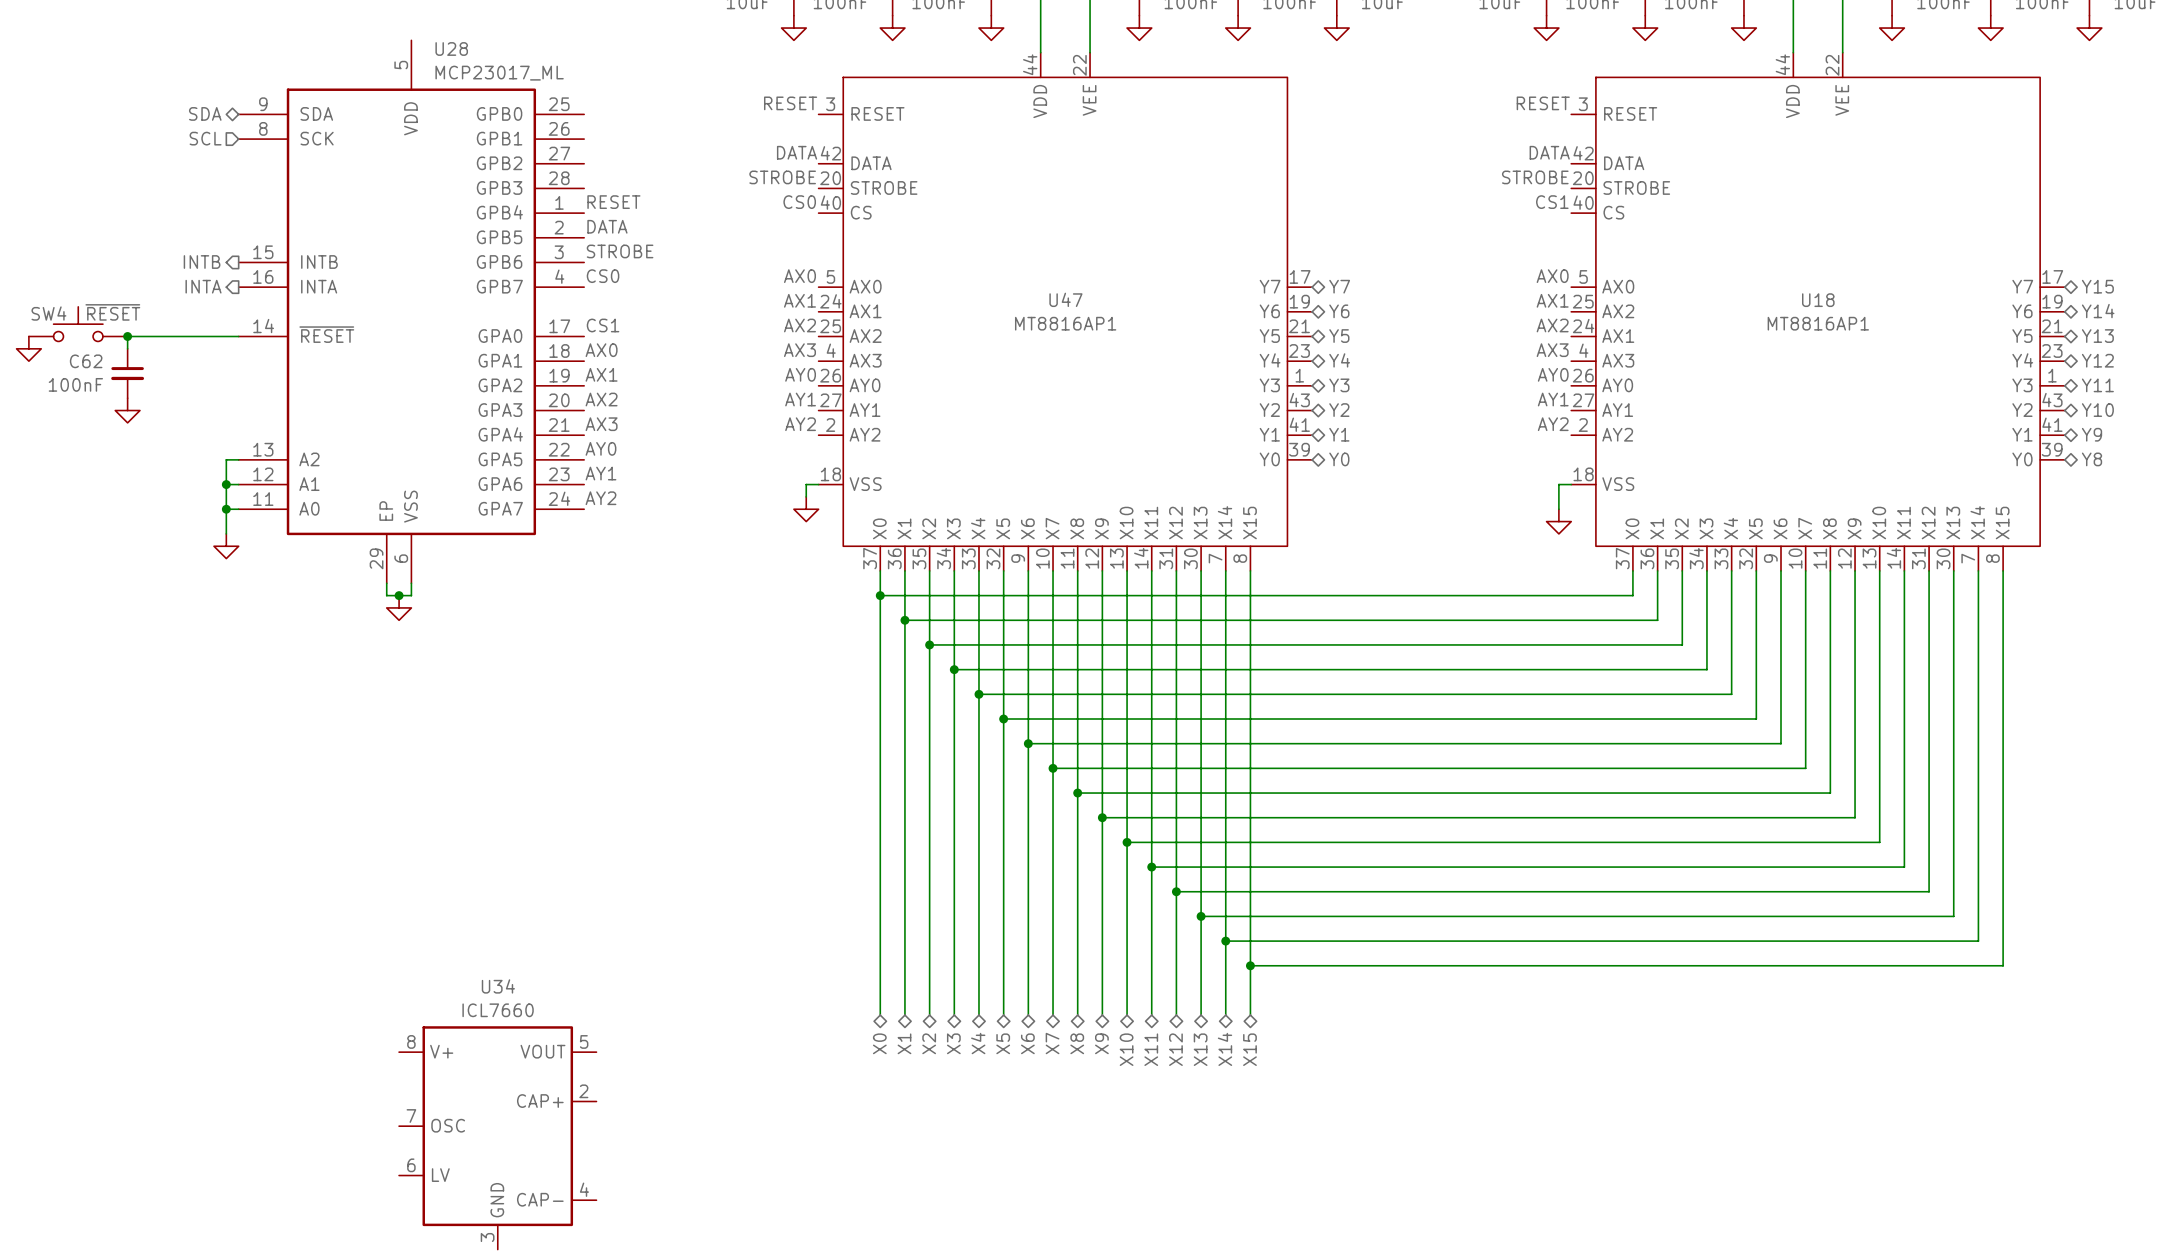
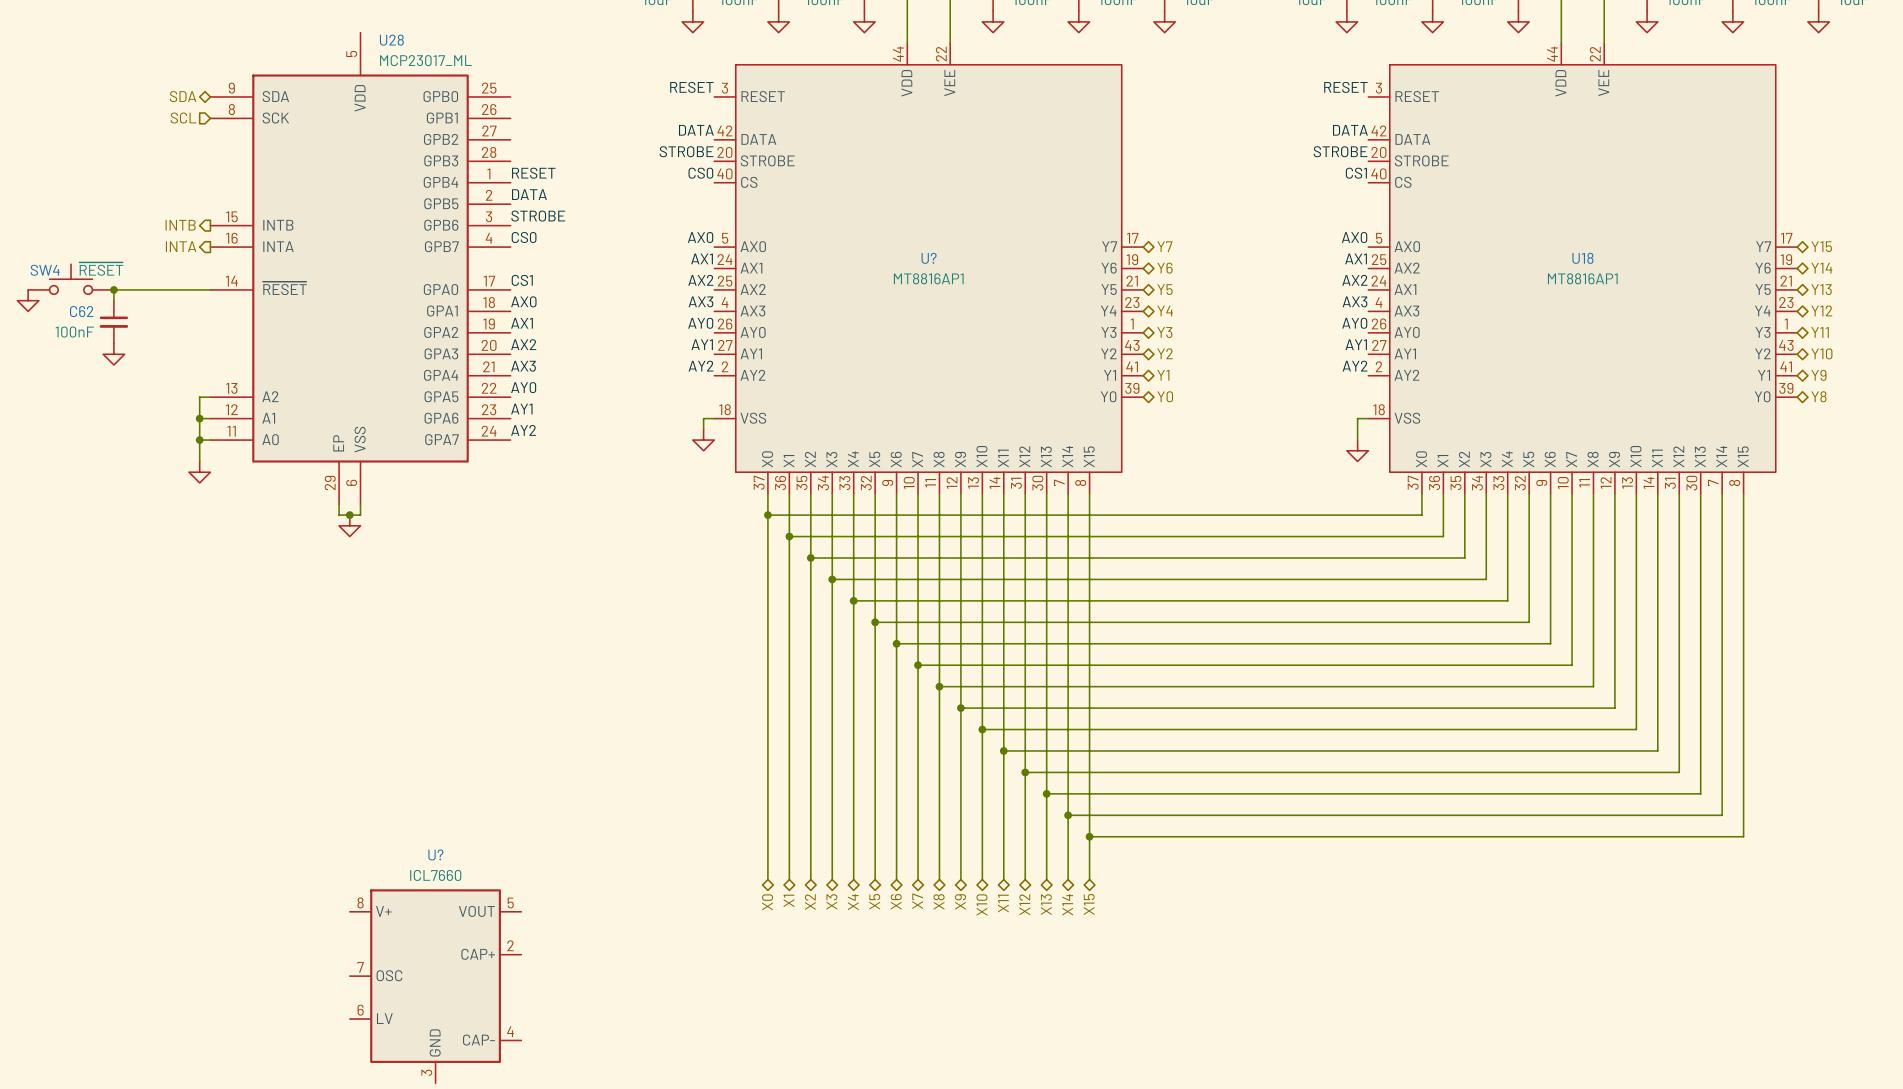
U47 name: U47 (1065, 299) -> U? (929, 258)
U34 name: U34 (498, 986) -> U? (435, 854)

